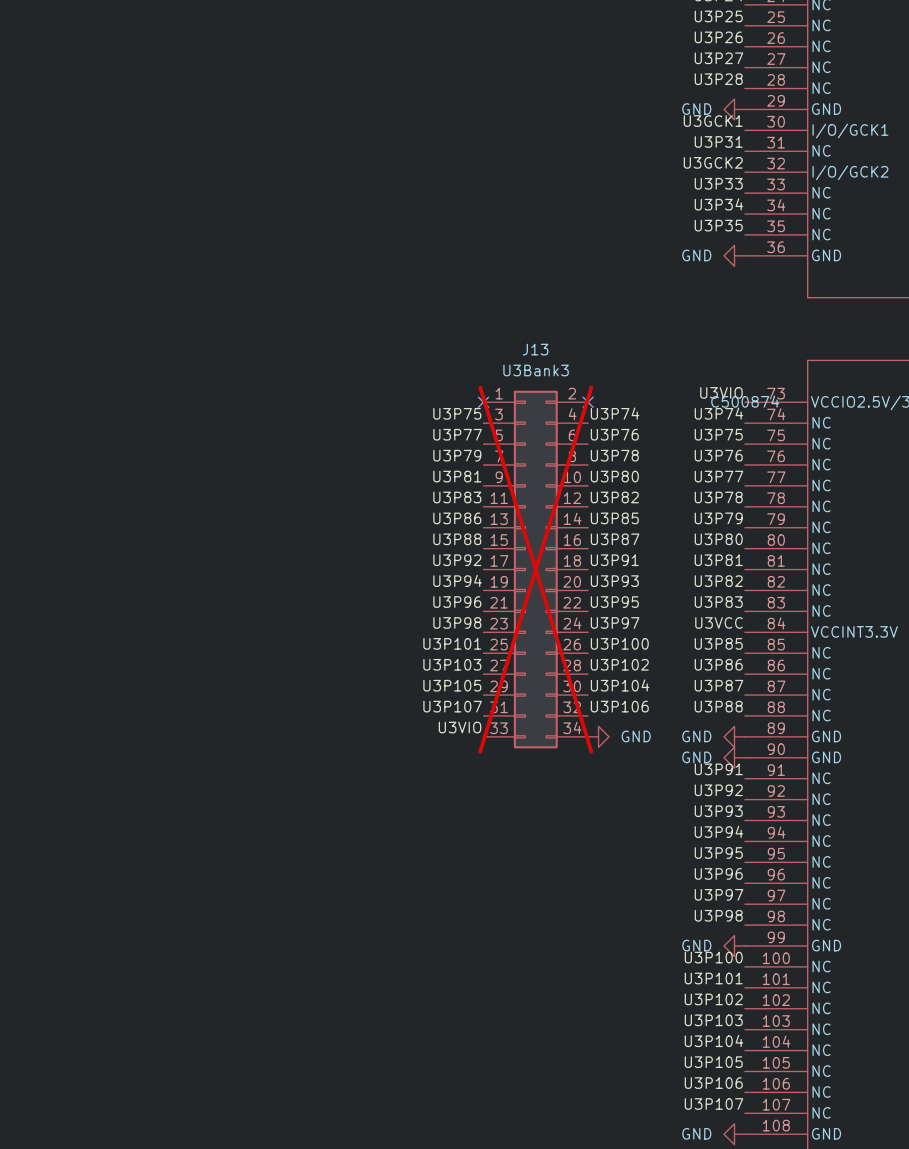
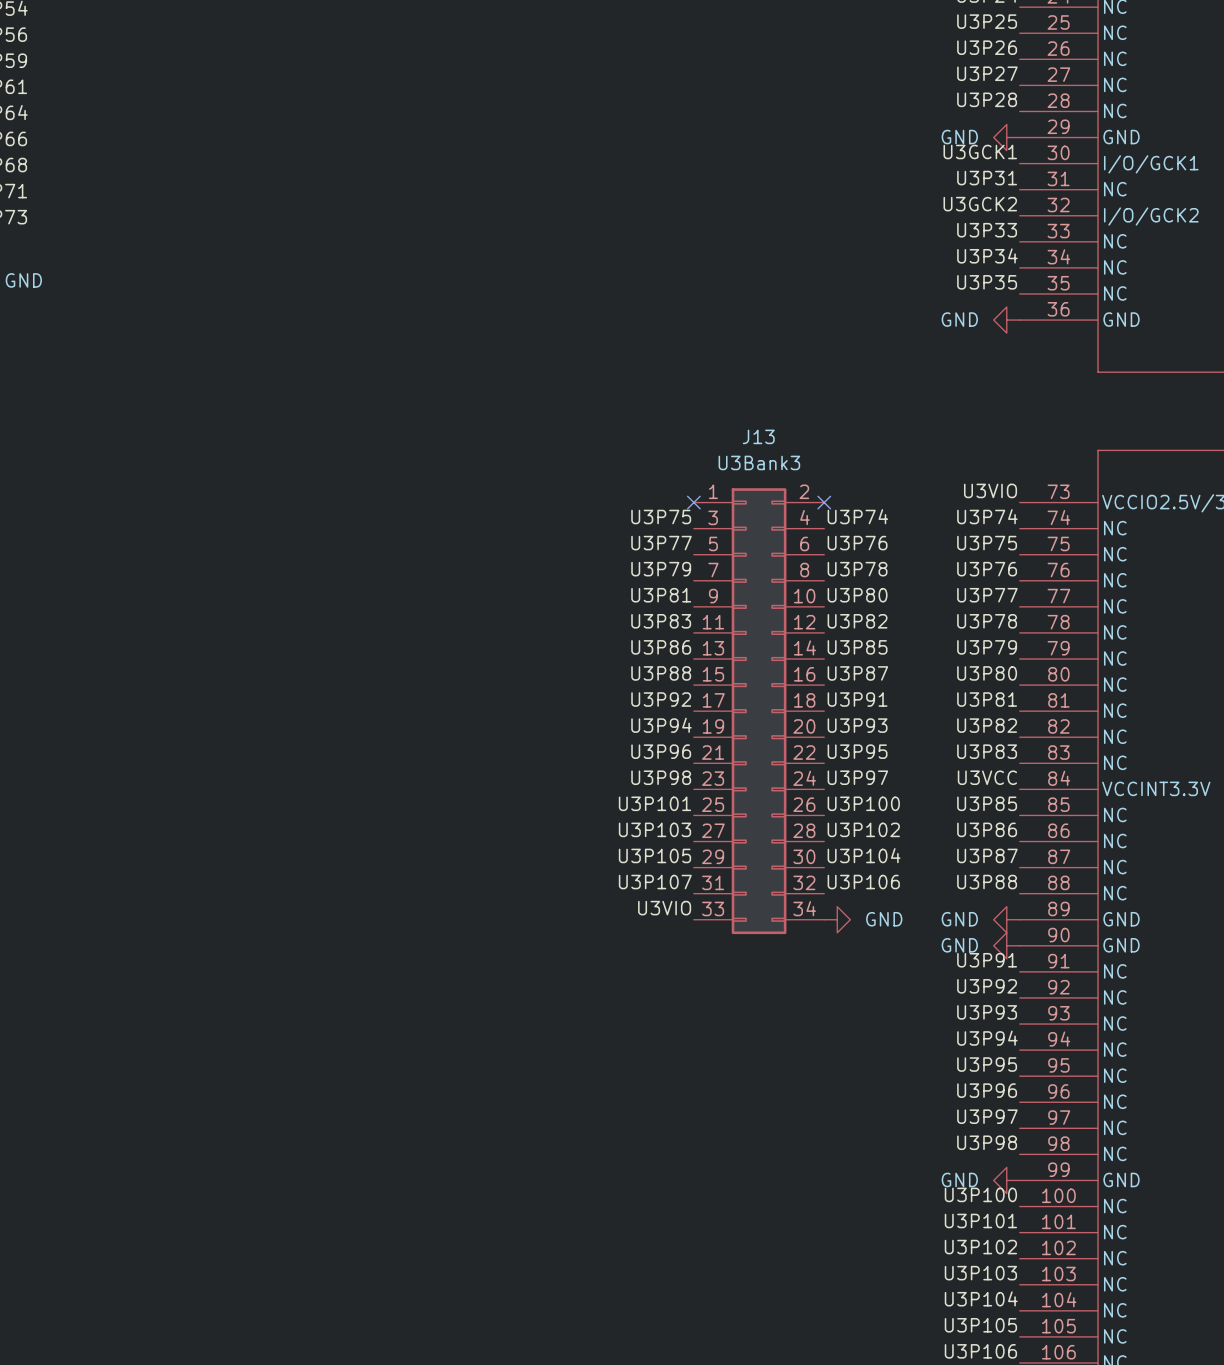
part text: C500874 (745, 401) -> none
J13 do-not-place cross: (535, 569) -> none

